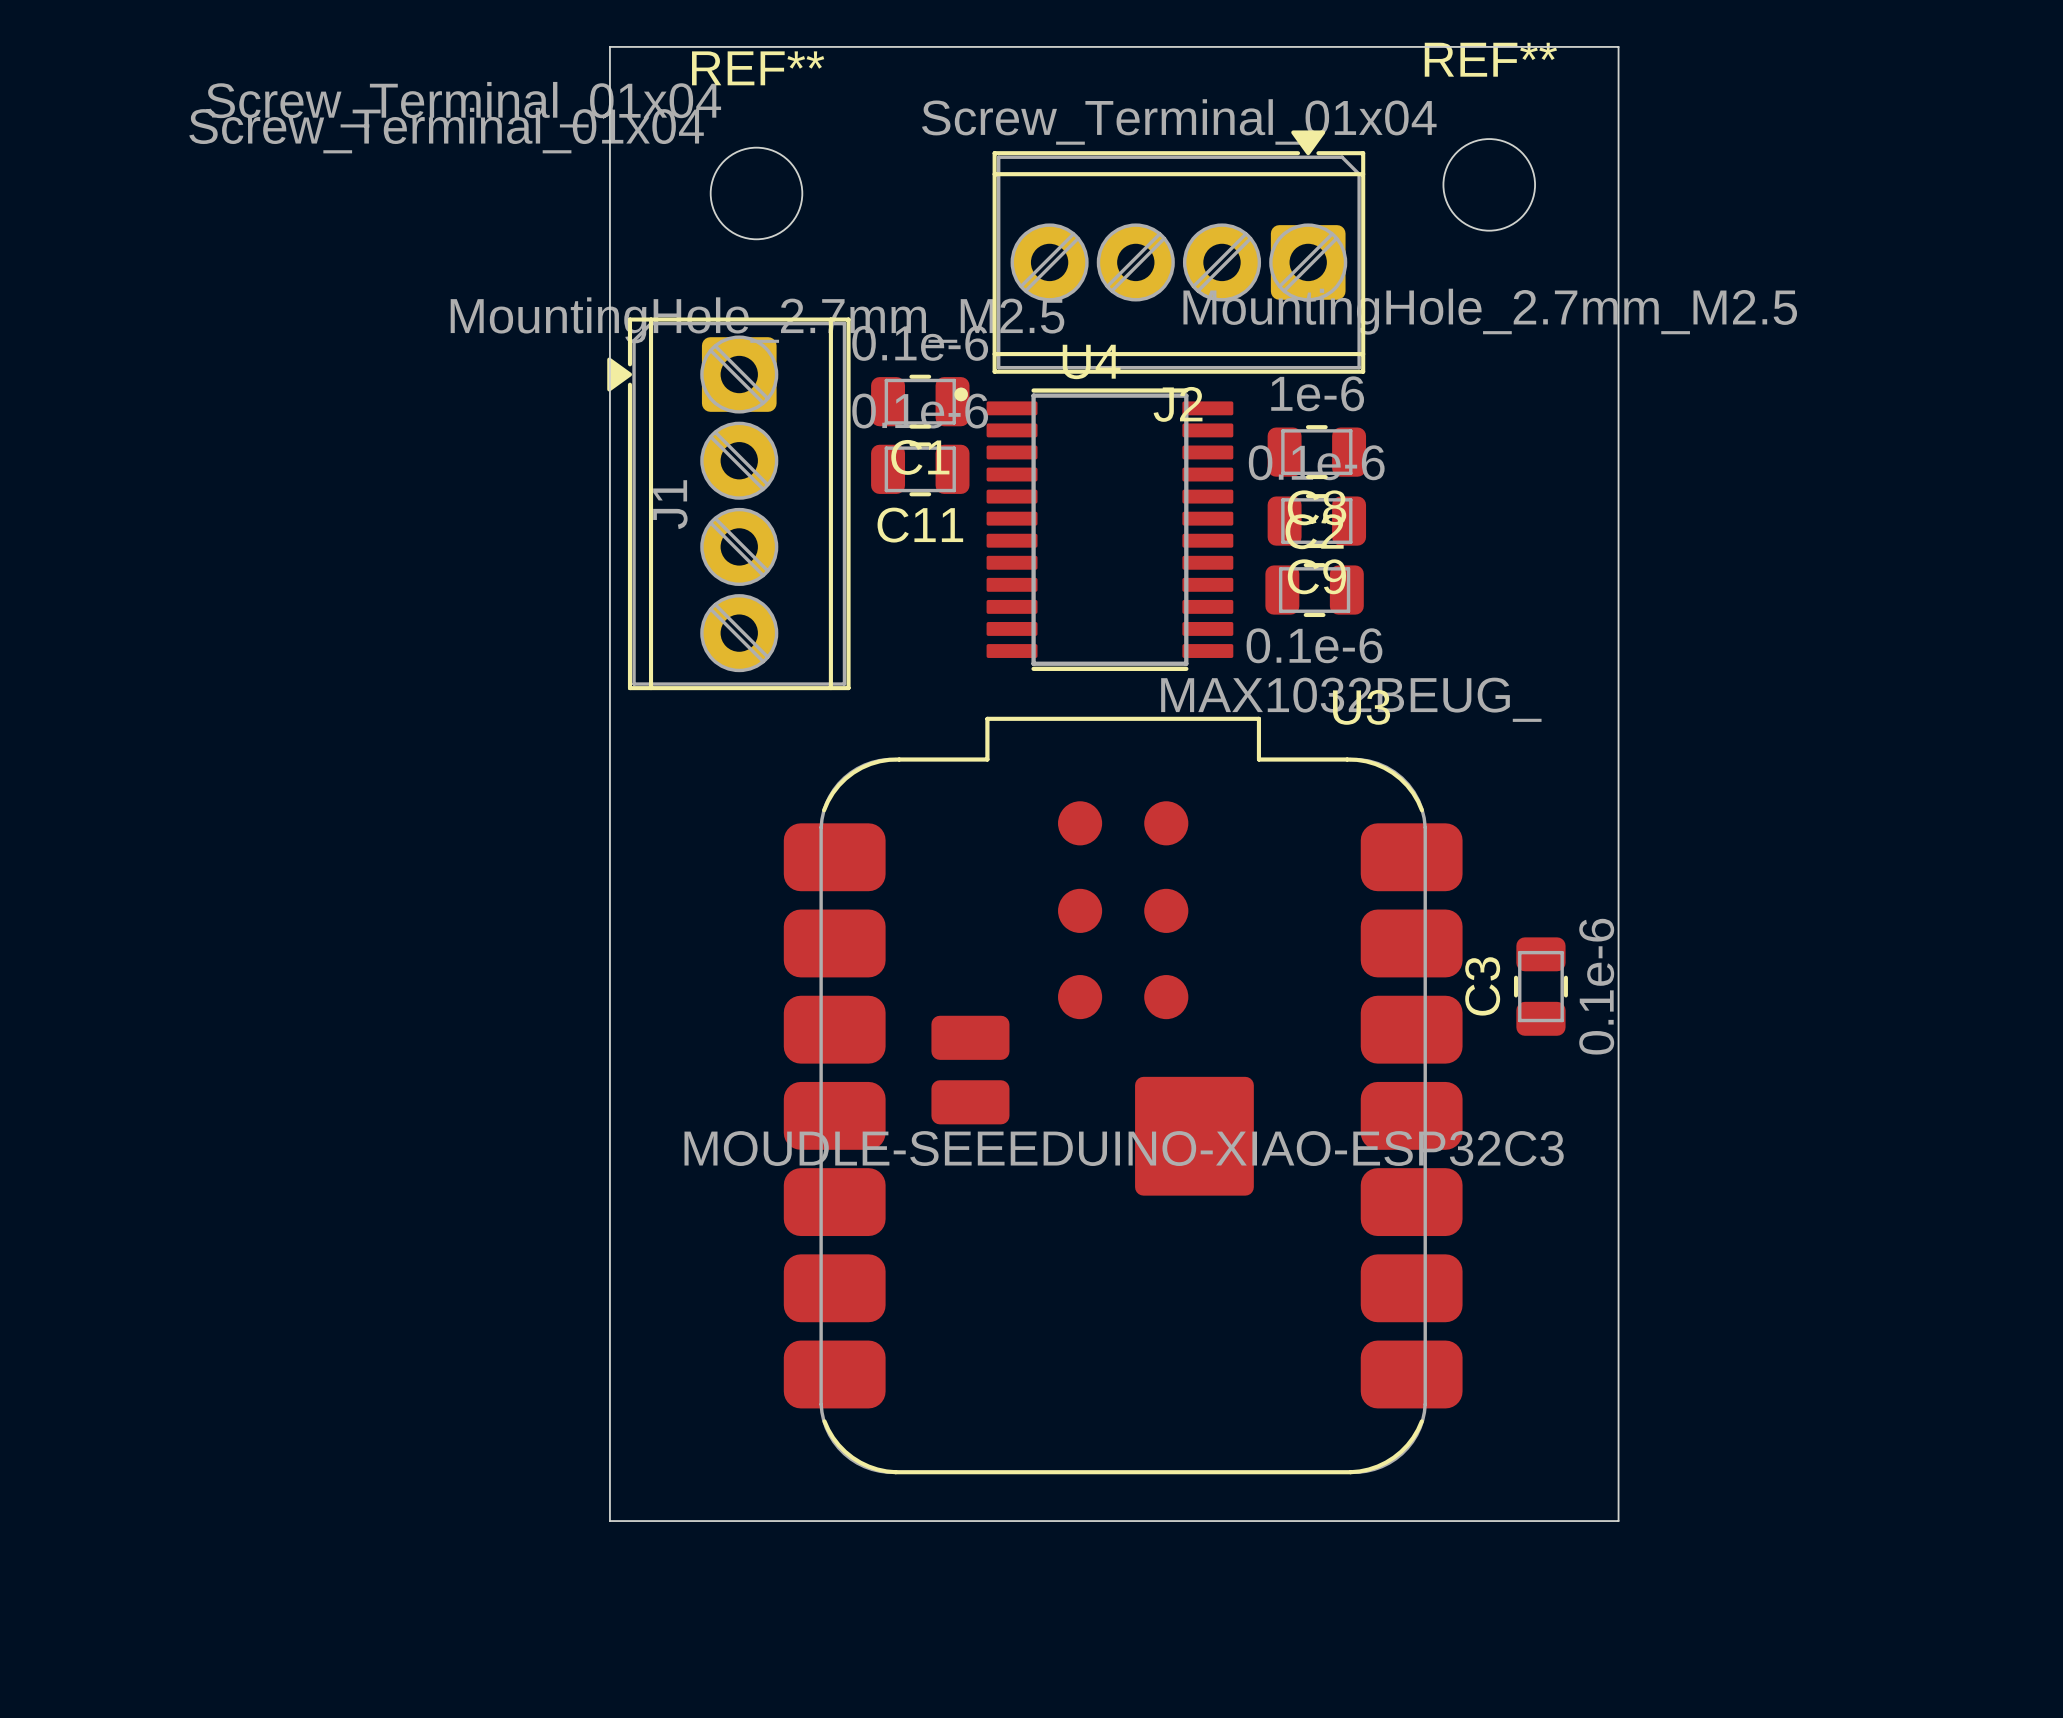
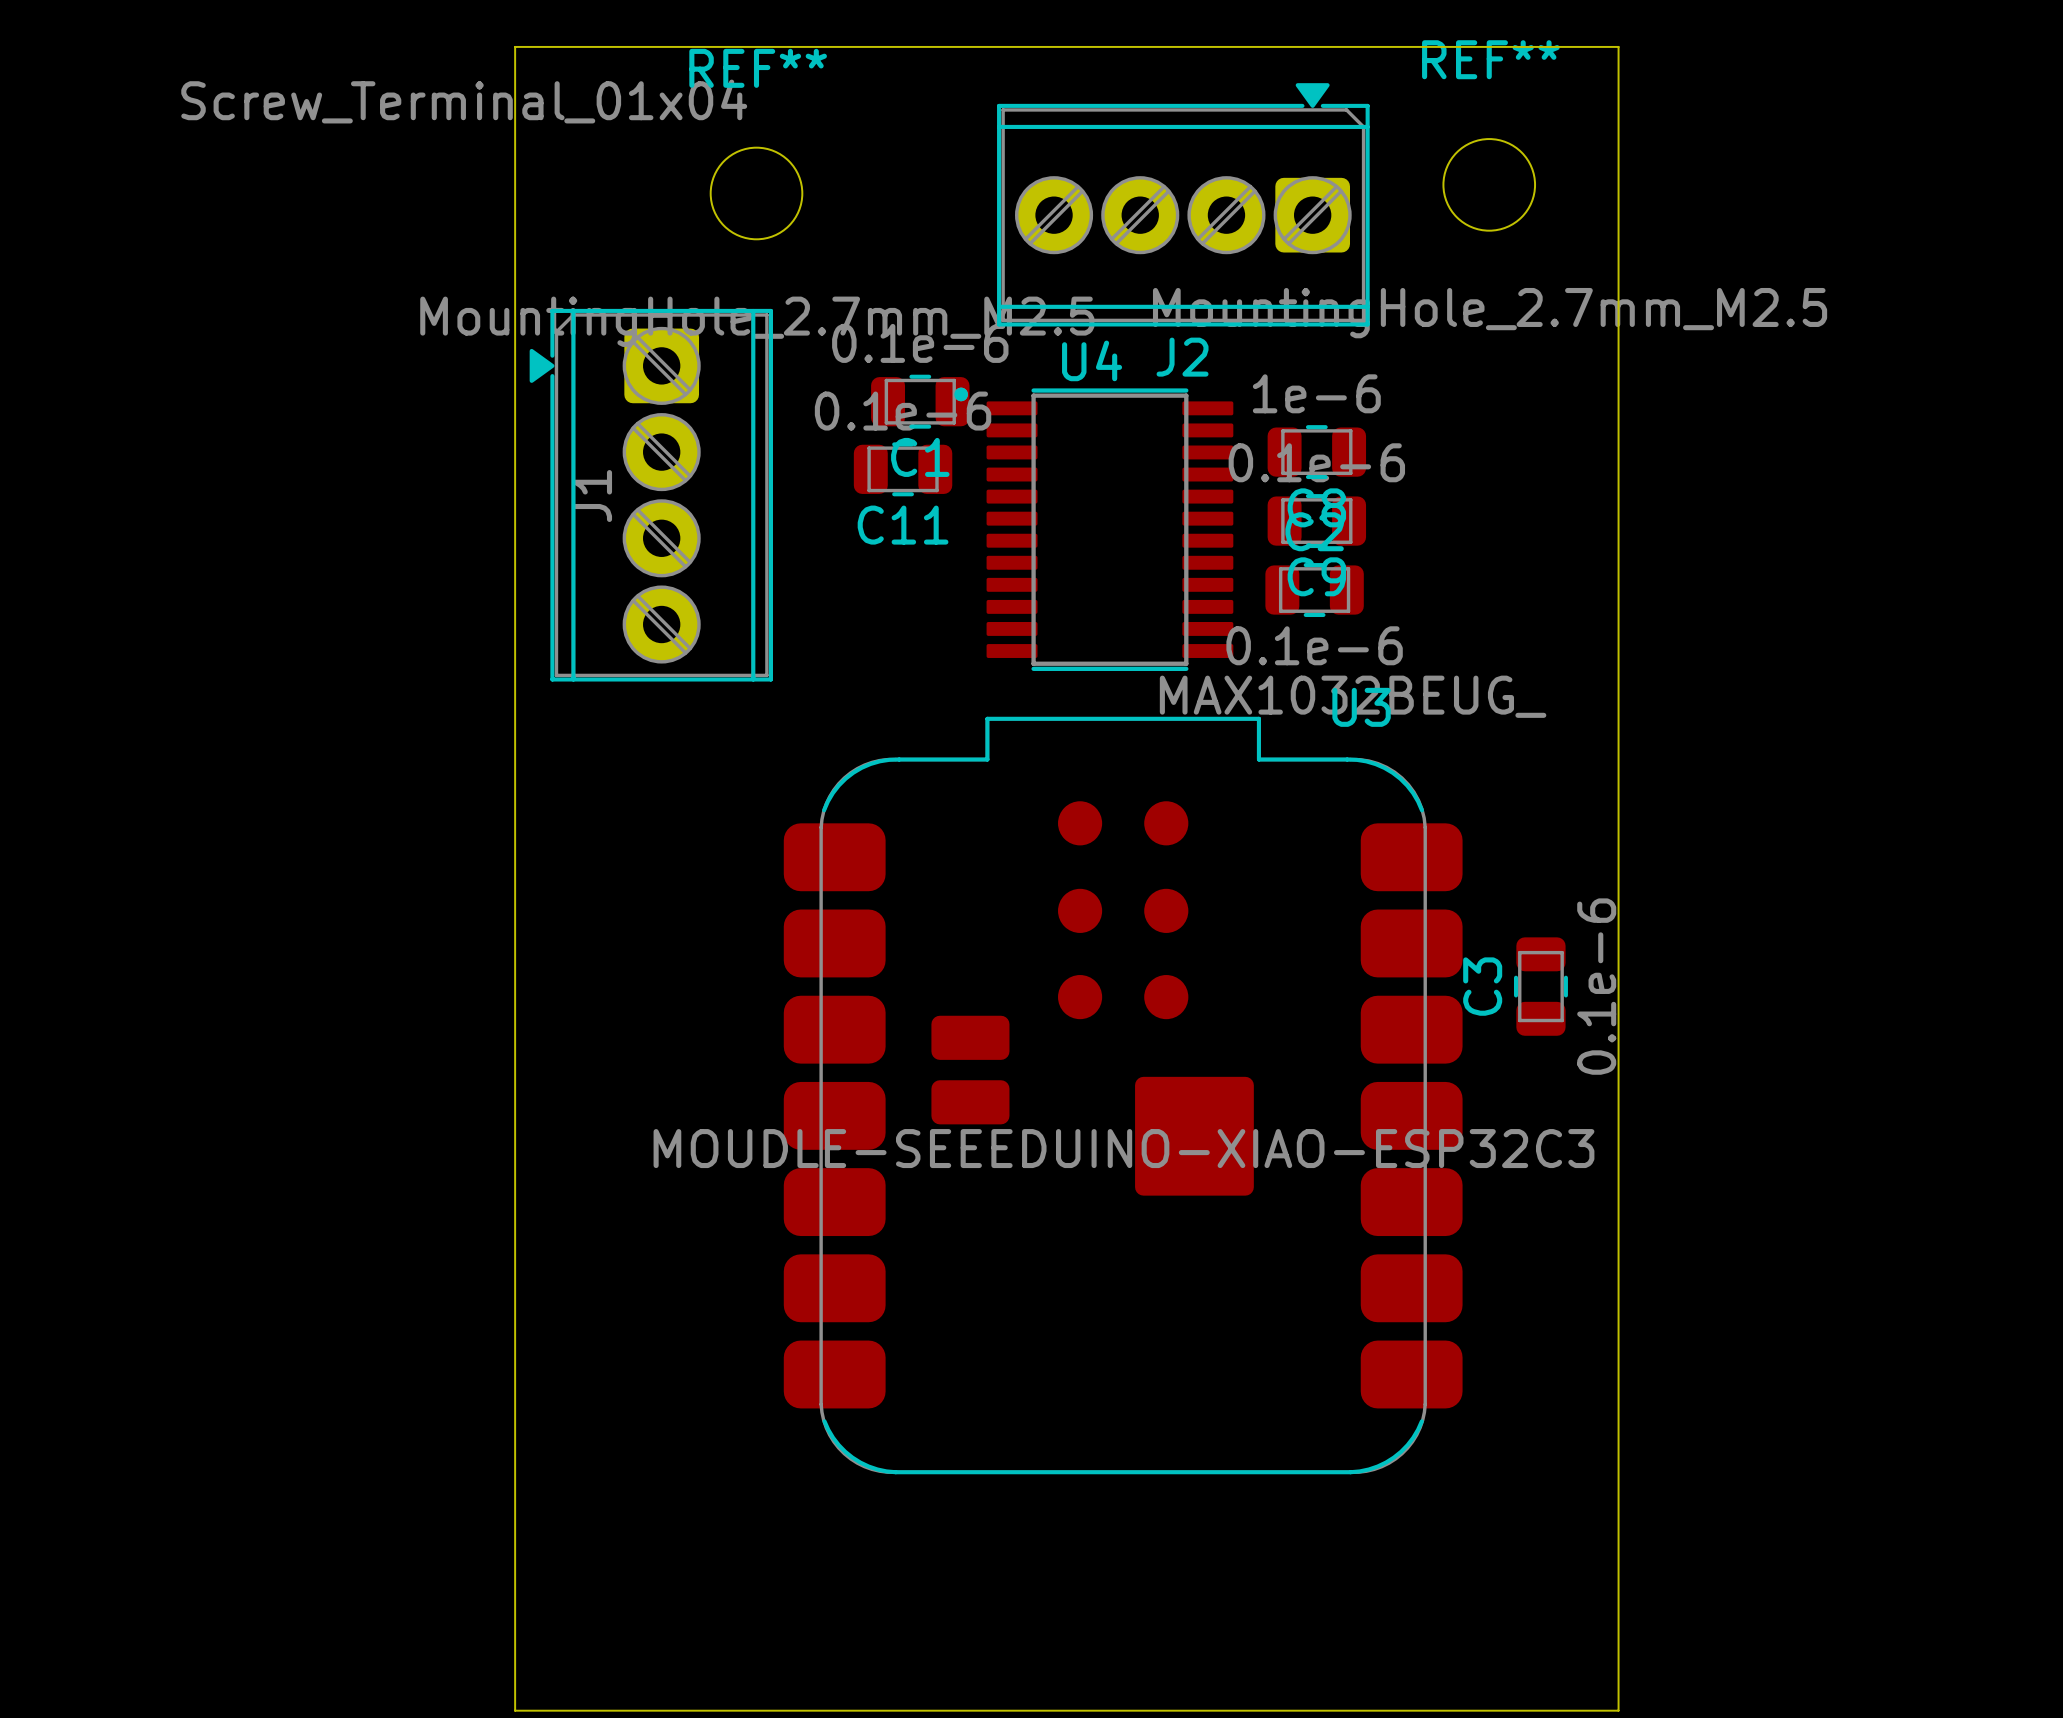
board edge: (609, 46) (609, 1521) (1618, 1521) -> (609, 46) (515, 46) (515, 1710) (1618, 1710) (1618, 1521)
J2 value: Screw_Terminal_01x04 (1179, 121) -> none
text: Screw_Terminal_01x04 (446, 130) -> none
J2 position: (1178, 252) -> (1183, 204)
C11 position: (920, 469) -> (903, 469)
J1 position: (728, 503) -> (651, 495)

